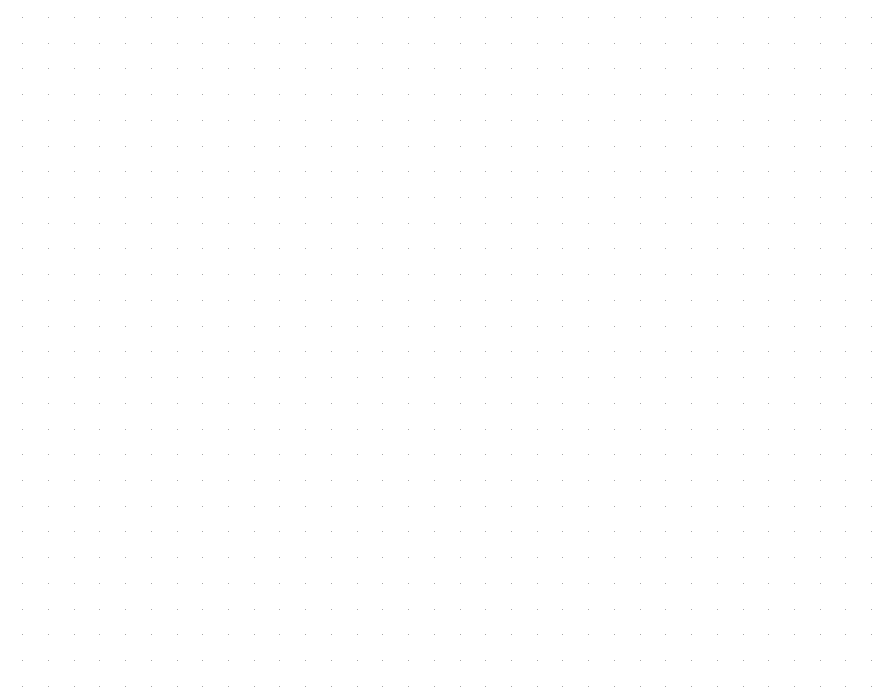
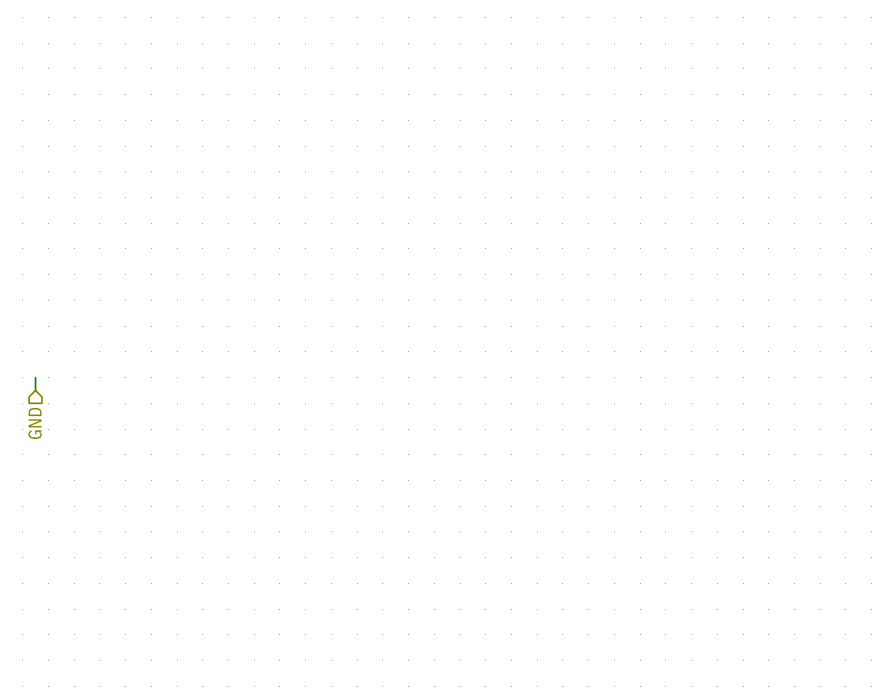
wire: none -> (35, 377) (35, 390)
hierarchical label: none -> GND (35, 423)

